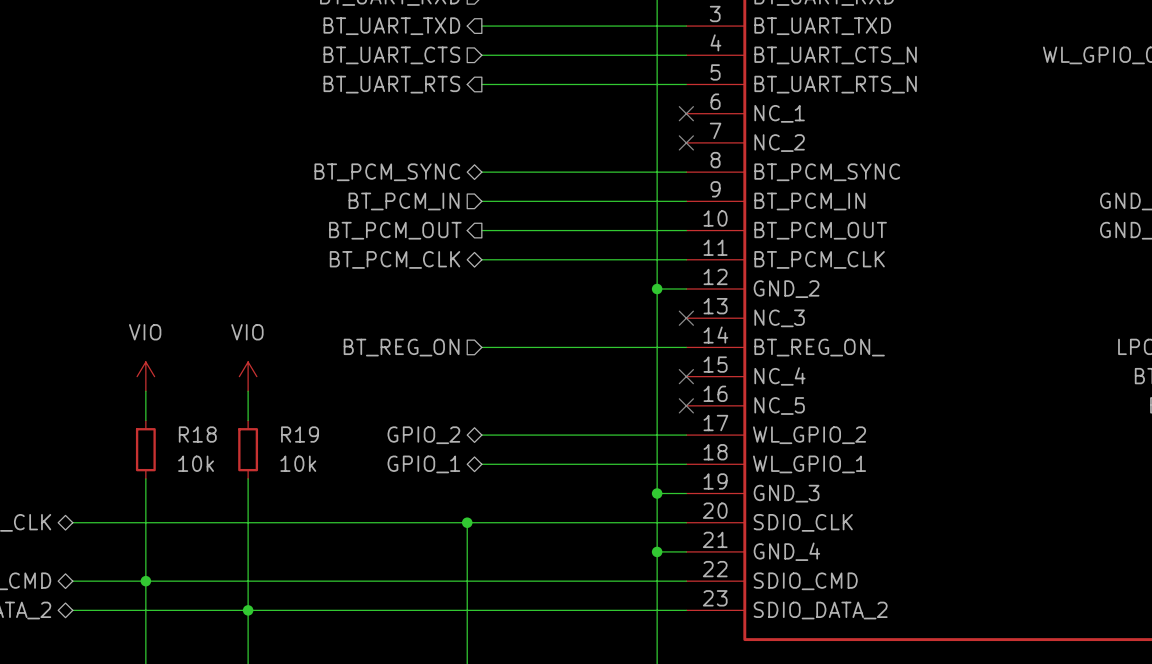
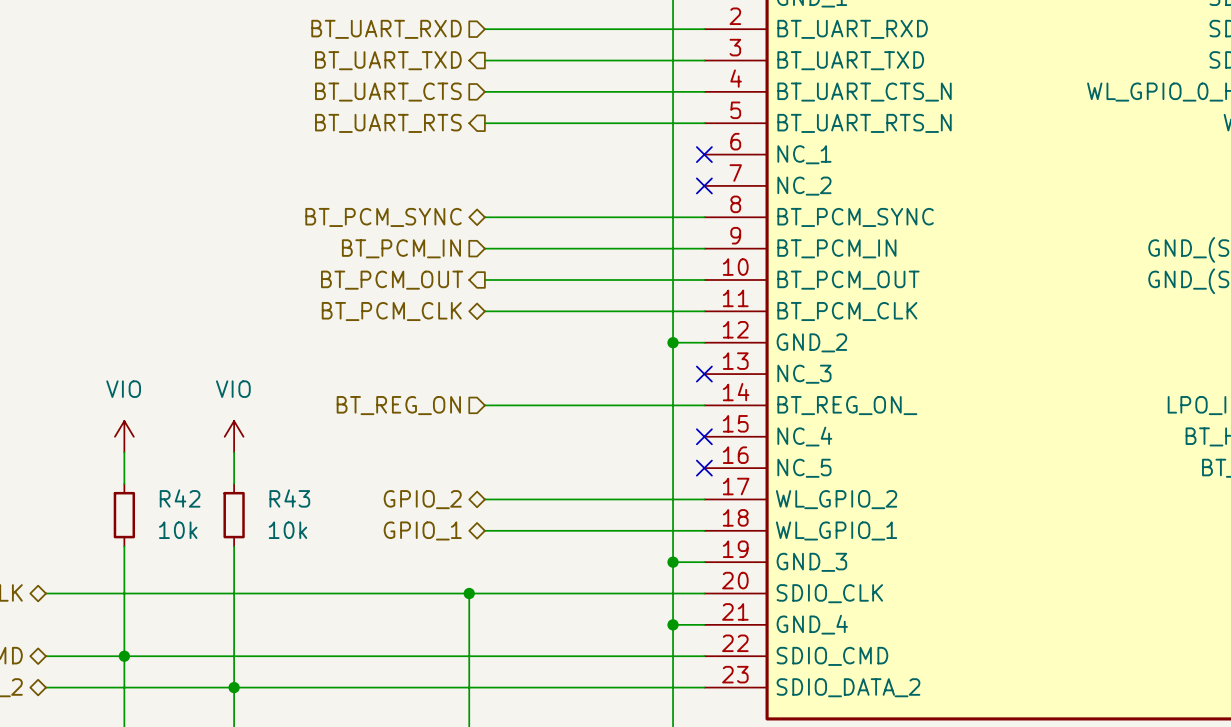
R18 name: R18 (197, 434) -> R42 (180, 498)
R19 name: R19 (300, 434) -> R43 (289, 498)

